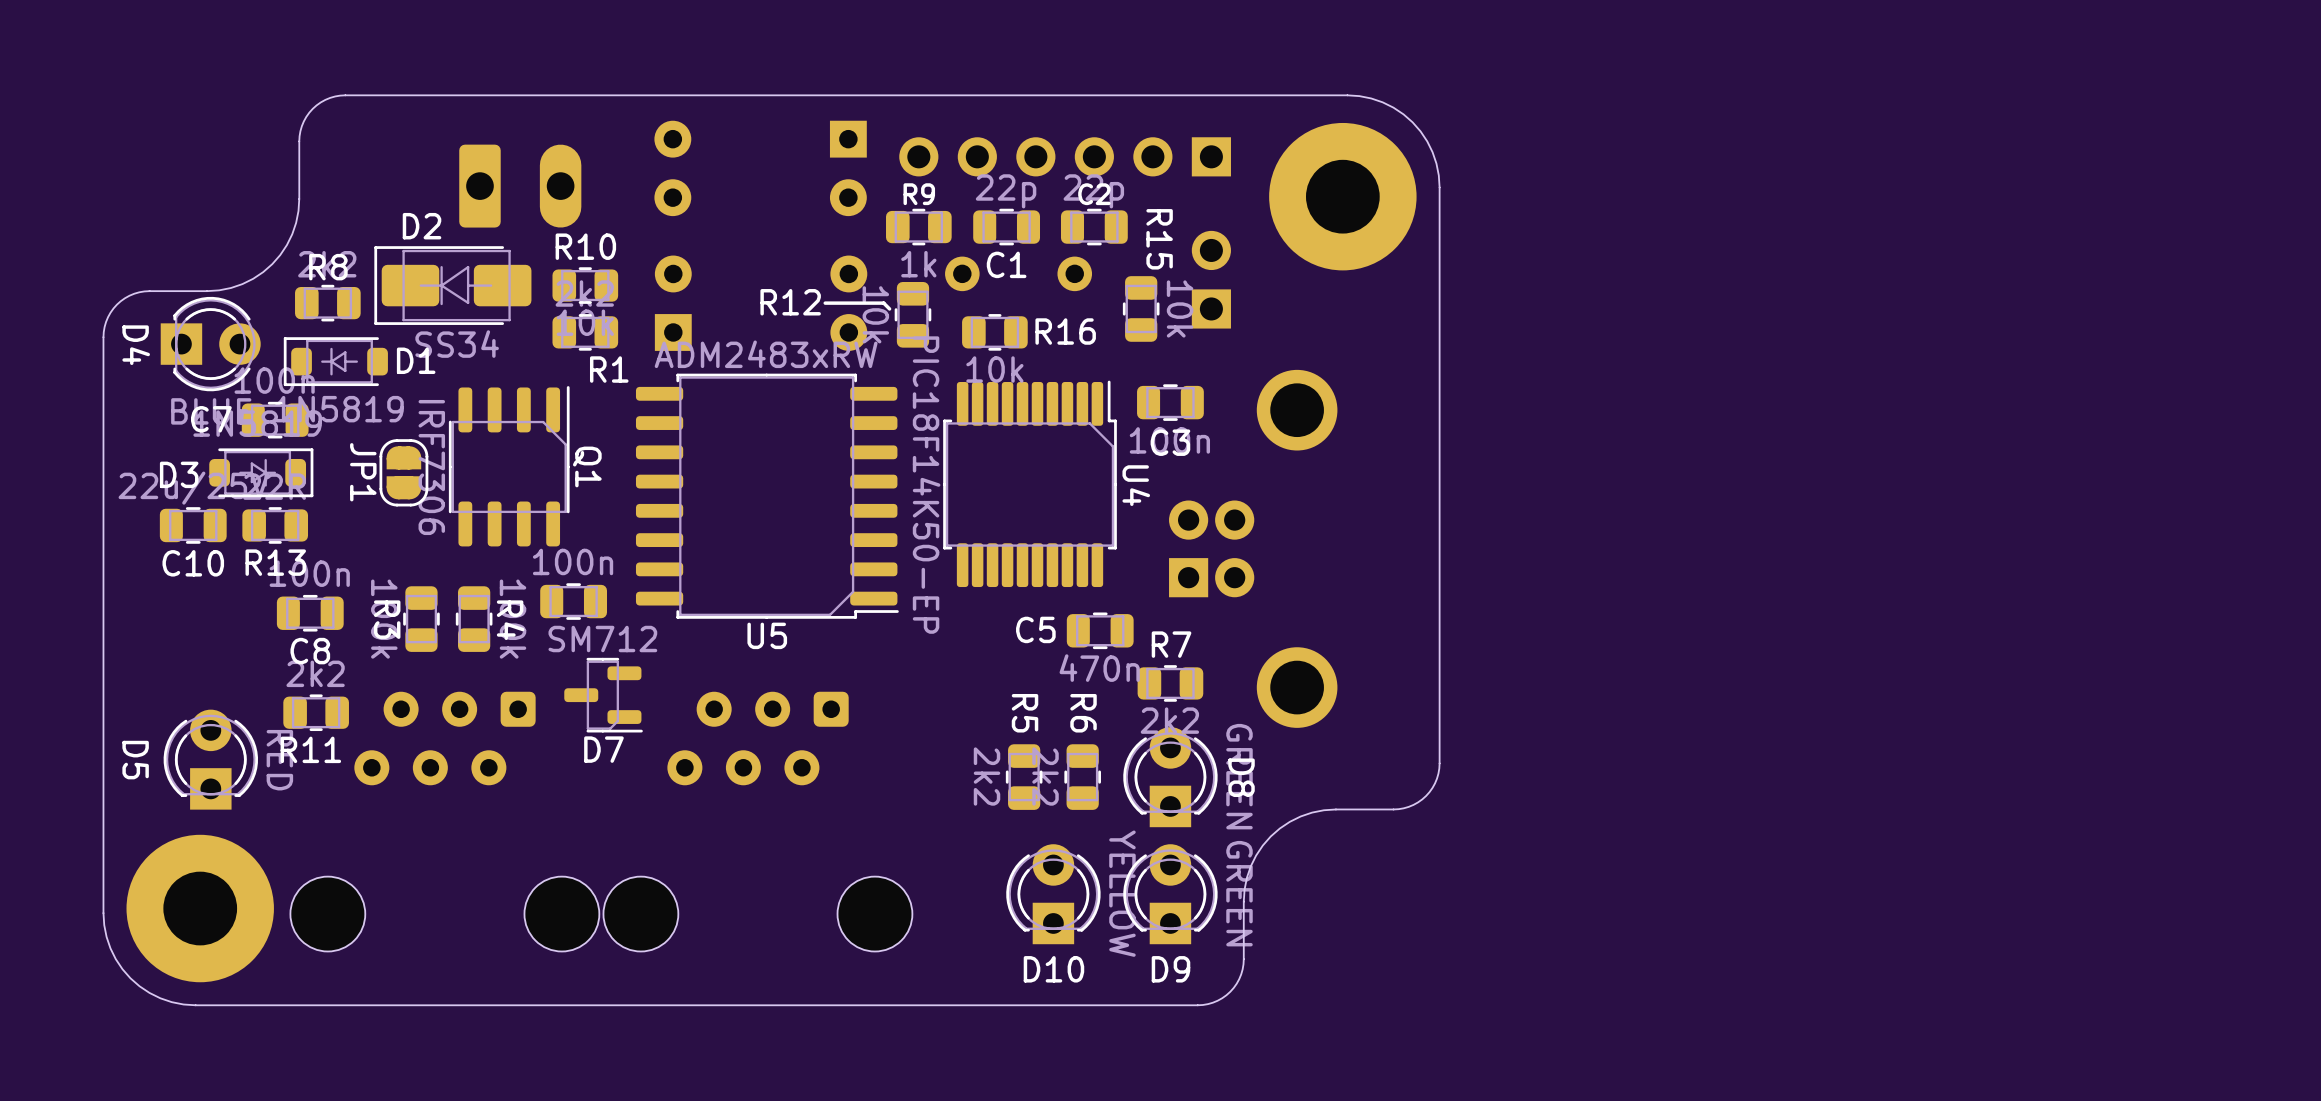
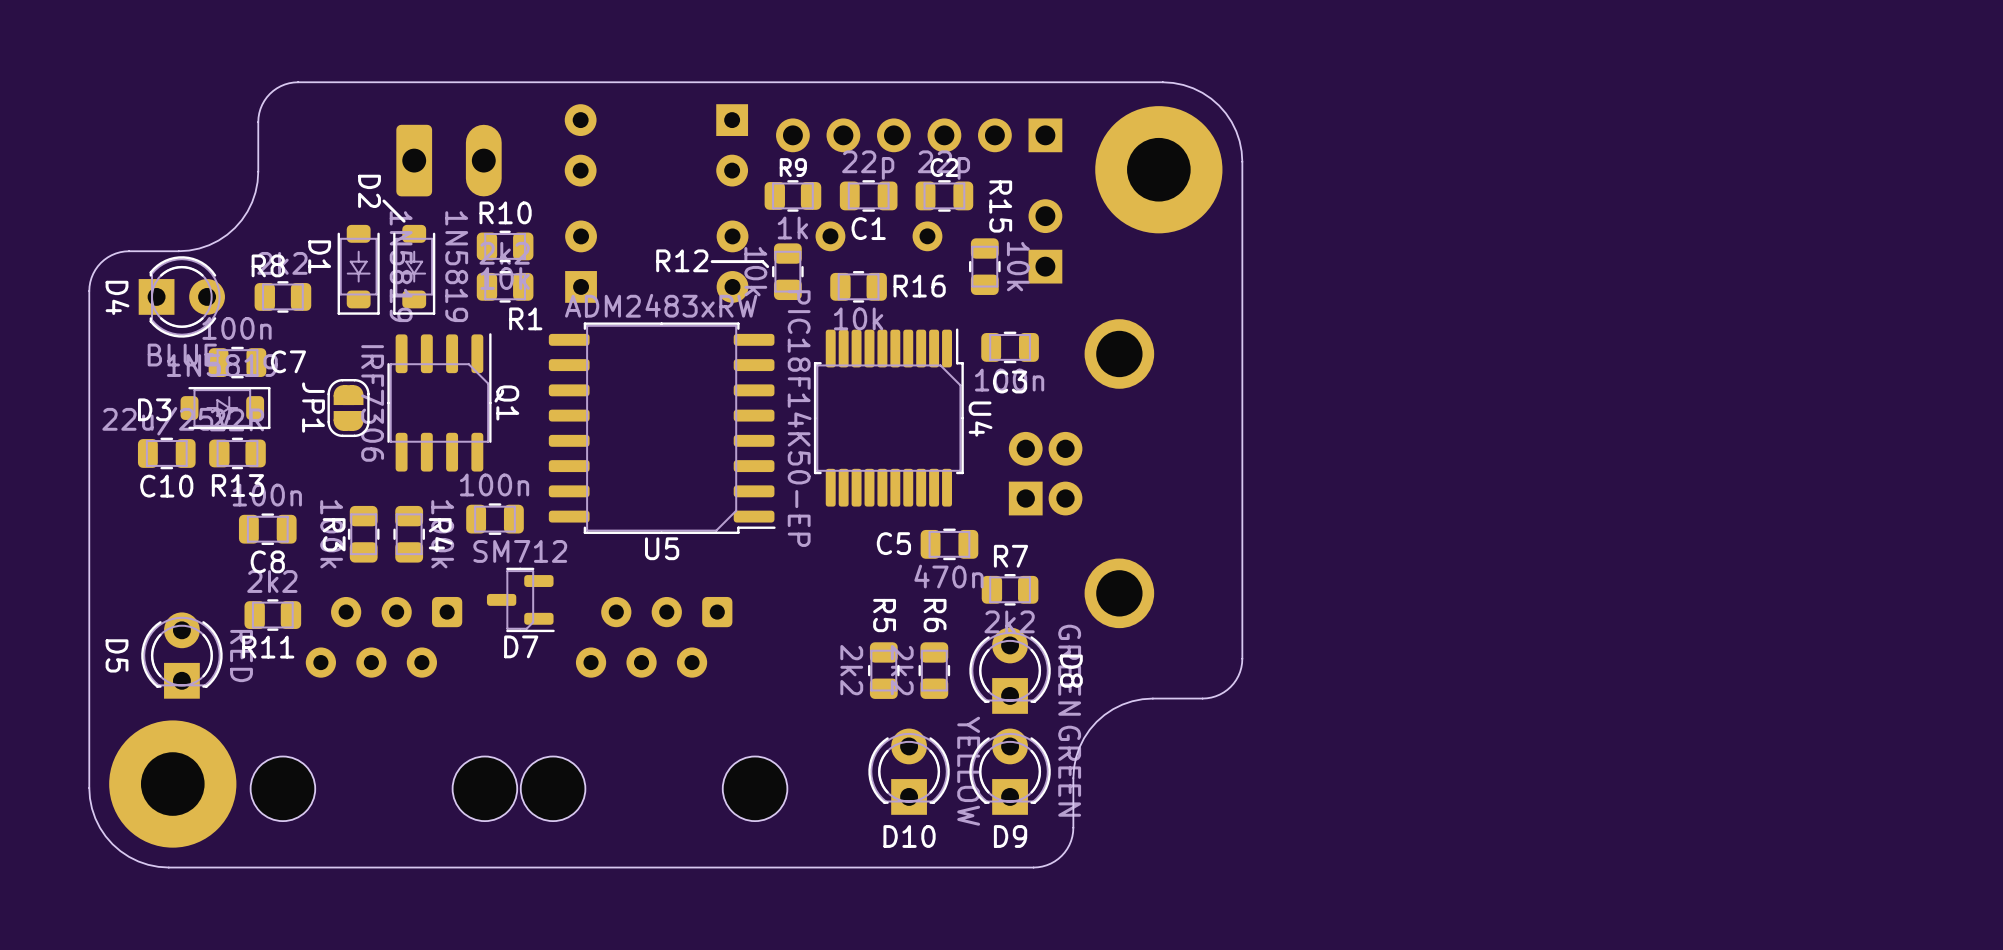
line: none -> (383, 200) (404, 221)
D2 footprint: [374, 246, 532, 325] -> [393, 224, 436, 315]
R8 name position: R8 (328, 267) -> R8 (268, 265)
R8 position: (327, 303) -> (282, 296)
D2 value: SS34 (457, 344) -> 1N5819 (456, 266)
D1 name position: D1 (416, 360) -> D1 (319, 257)
D1 rotation: 0° (335, 361) -> 90° counterclockwise (358, 269)
D1 position: (335, 361) -> (358, 269)
C7 name position: C7 (211, 419) -> C7 (288, 361)

